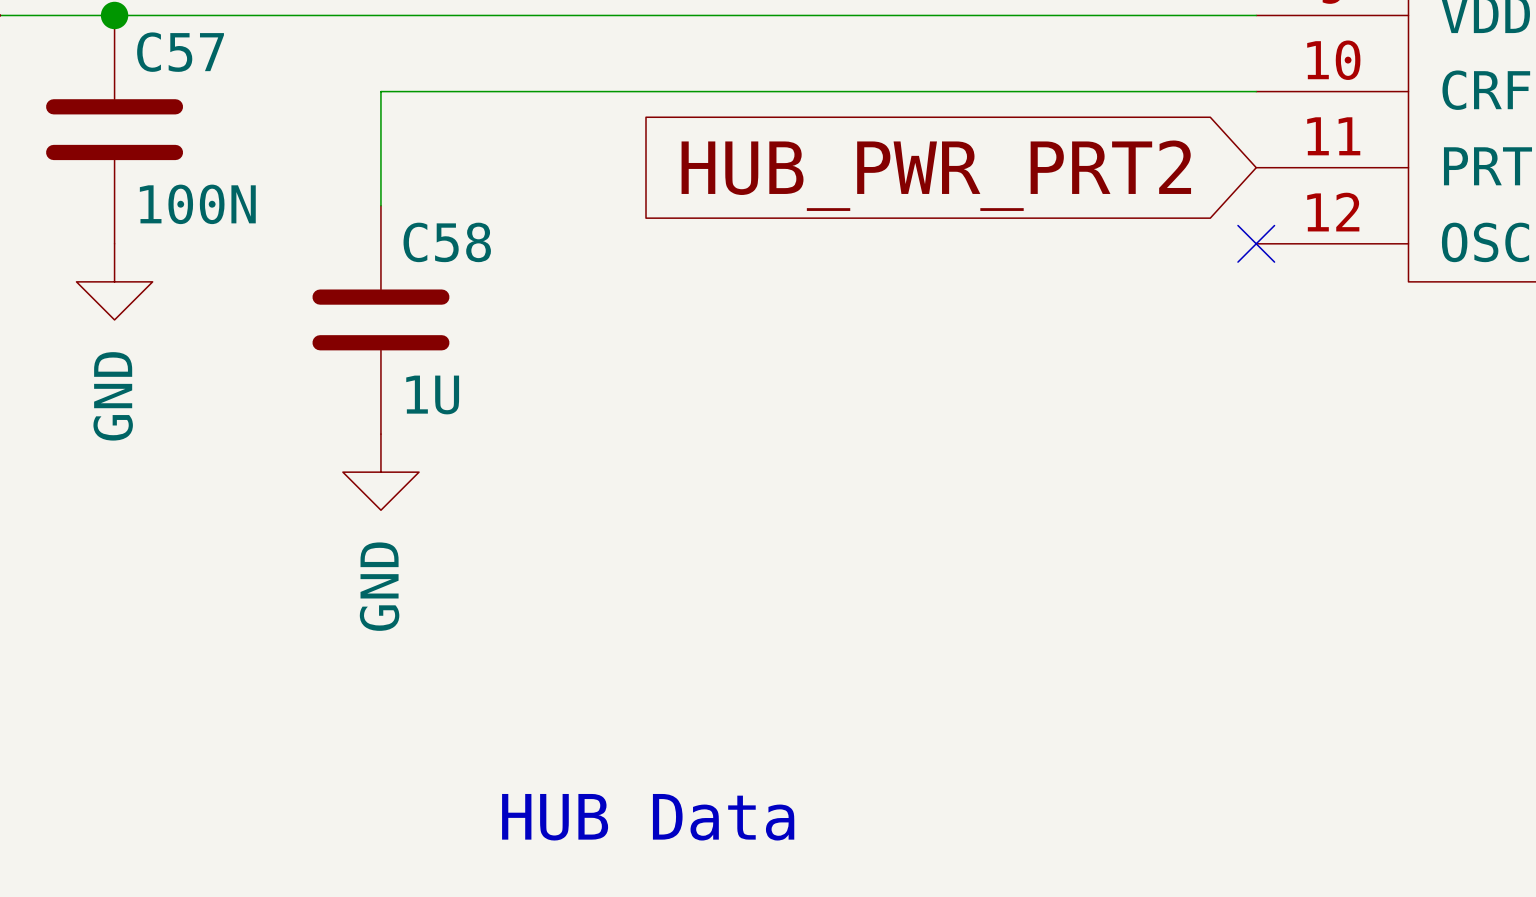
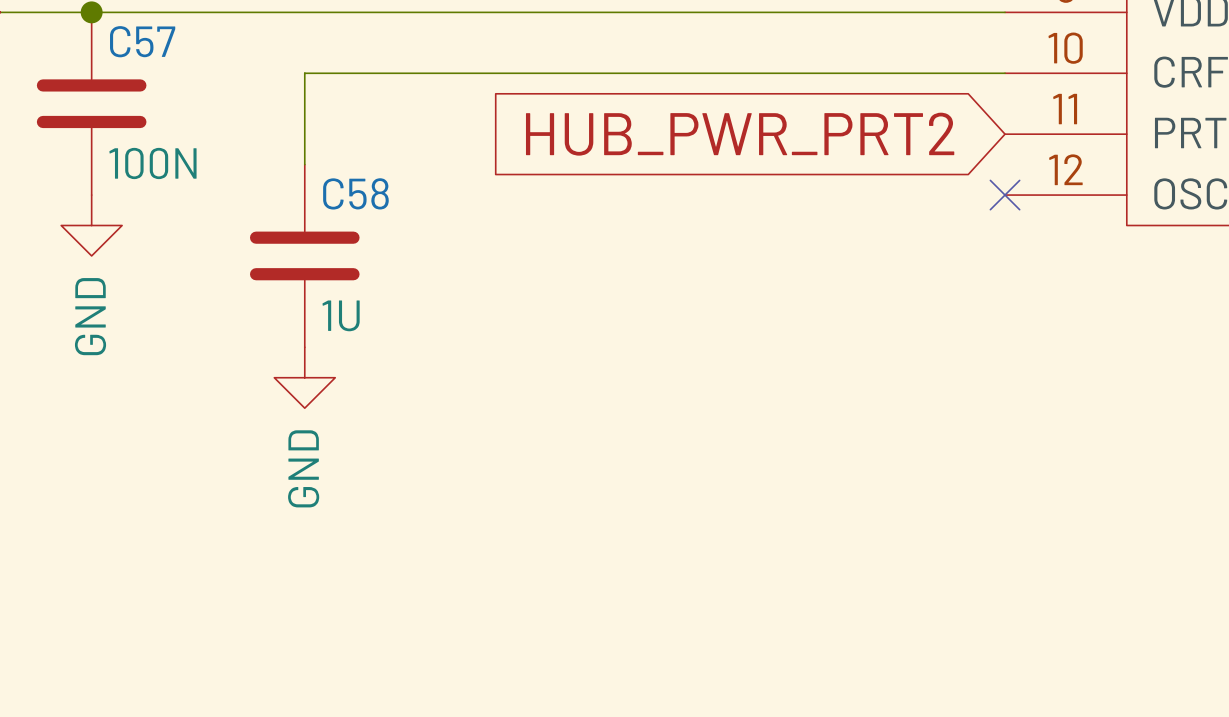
text: HUB Data (648, 817) -> none

